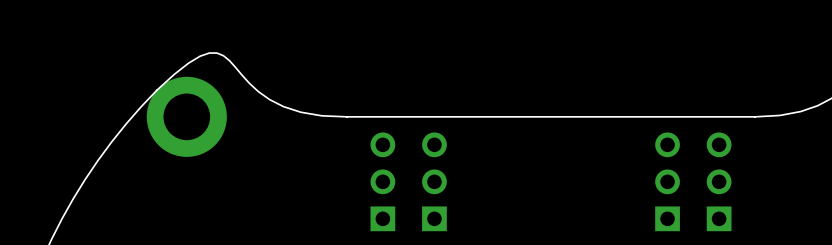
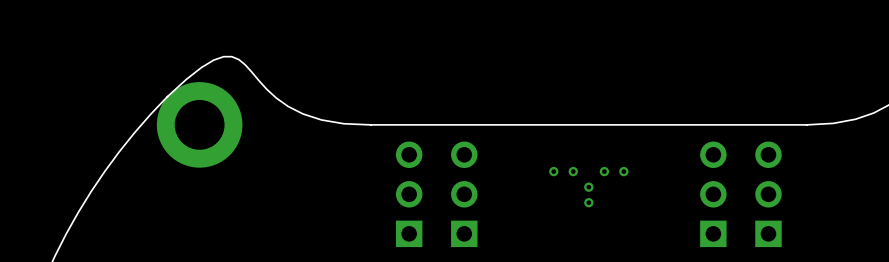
via: none -> (553, 171)
via: none -> (573, 171)
via: none -> (604, 171)
via: none -> (623, 171)
via: none -> (588, 187)
via: none -> (588, 202)

